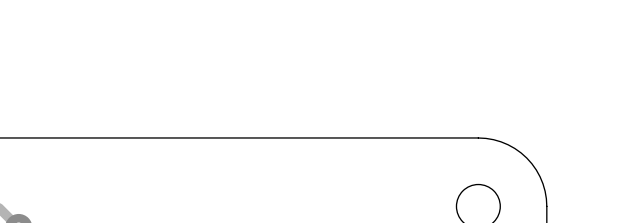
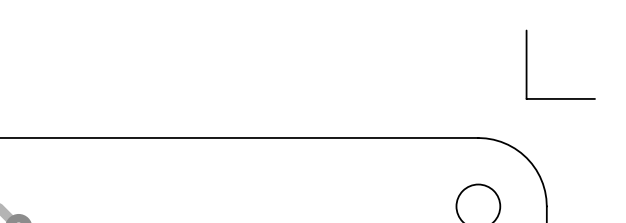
board edge: none -> (526, 30) (526, 98) (595, 98)

